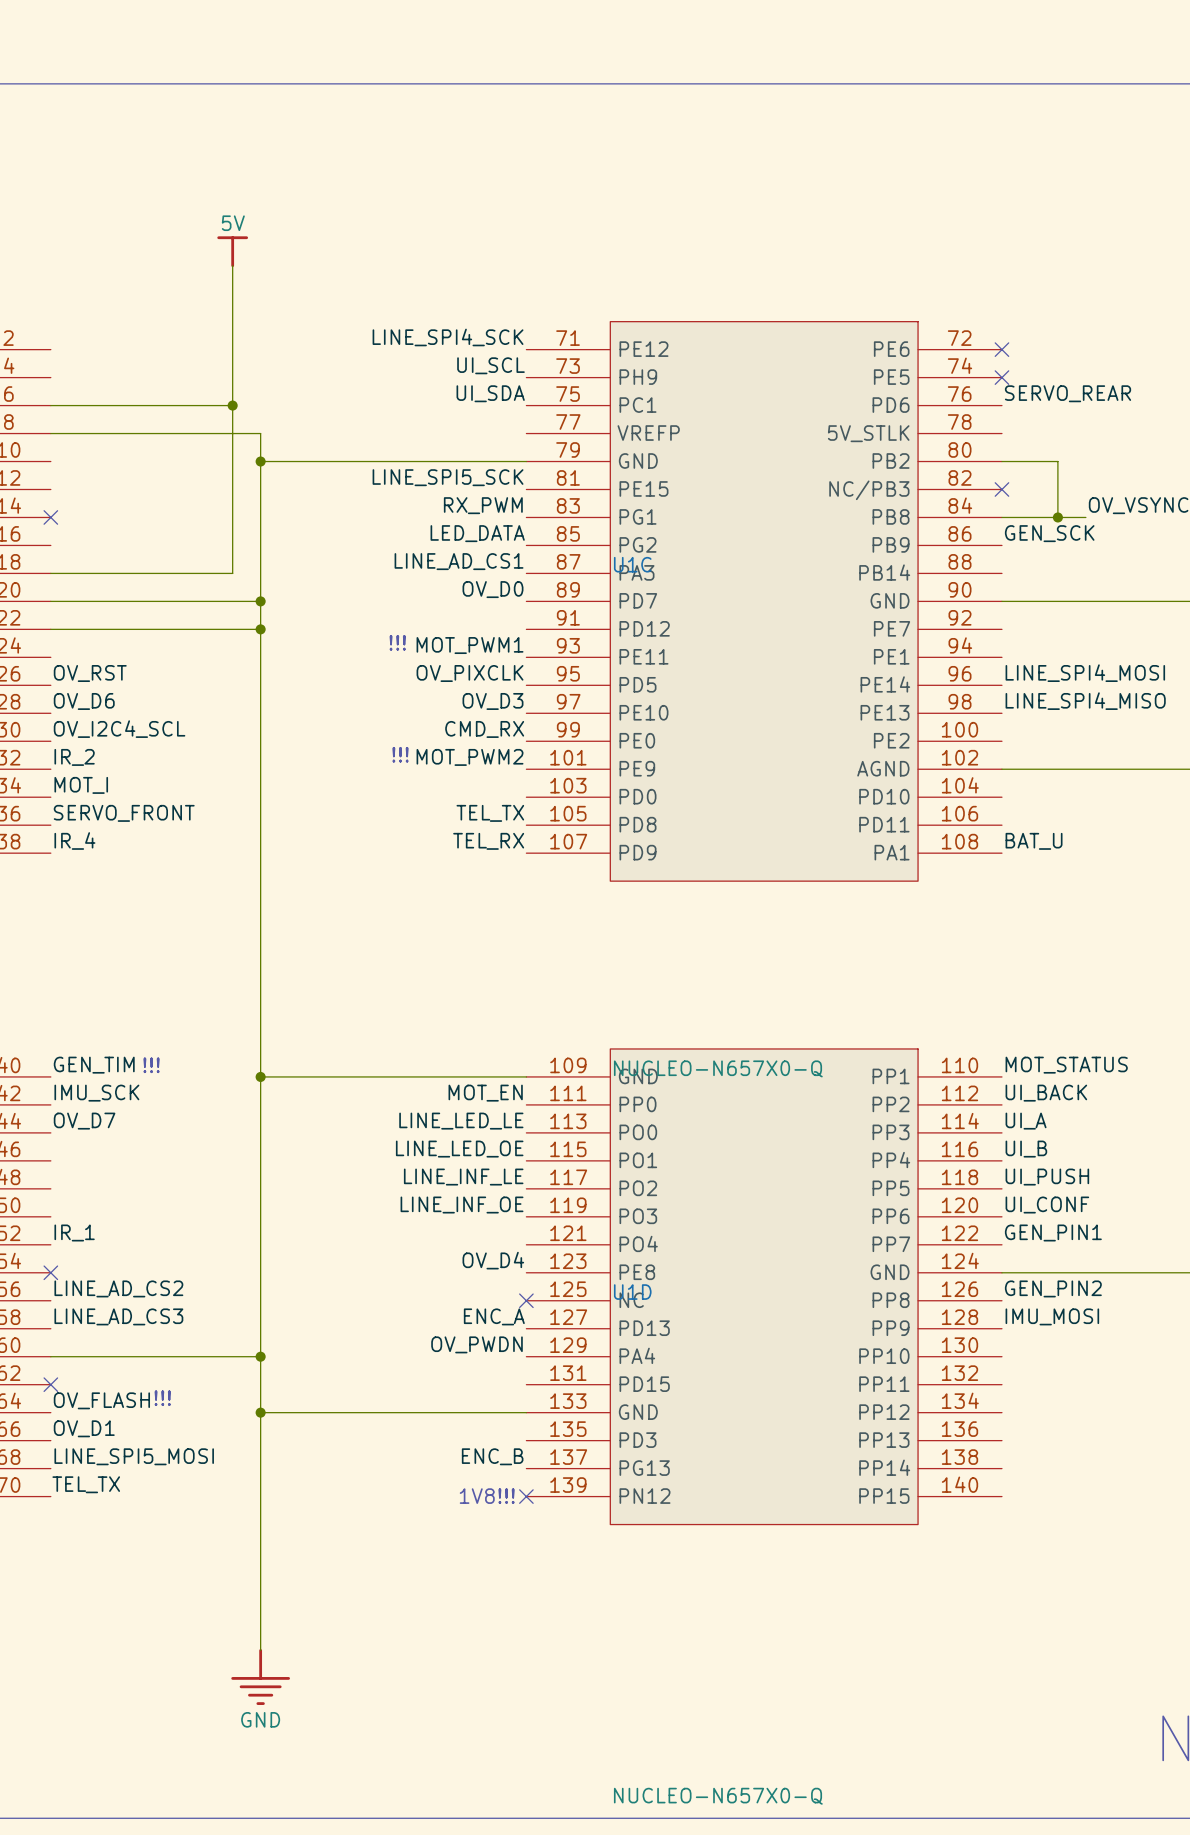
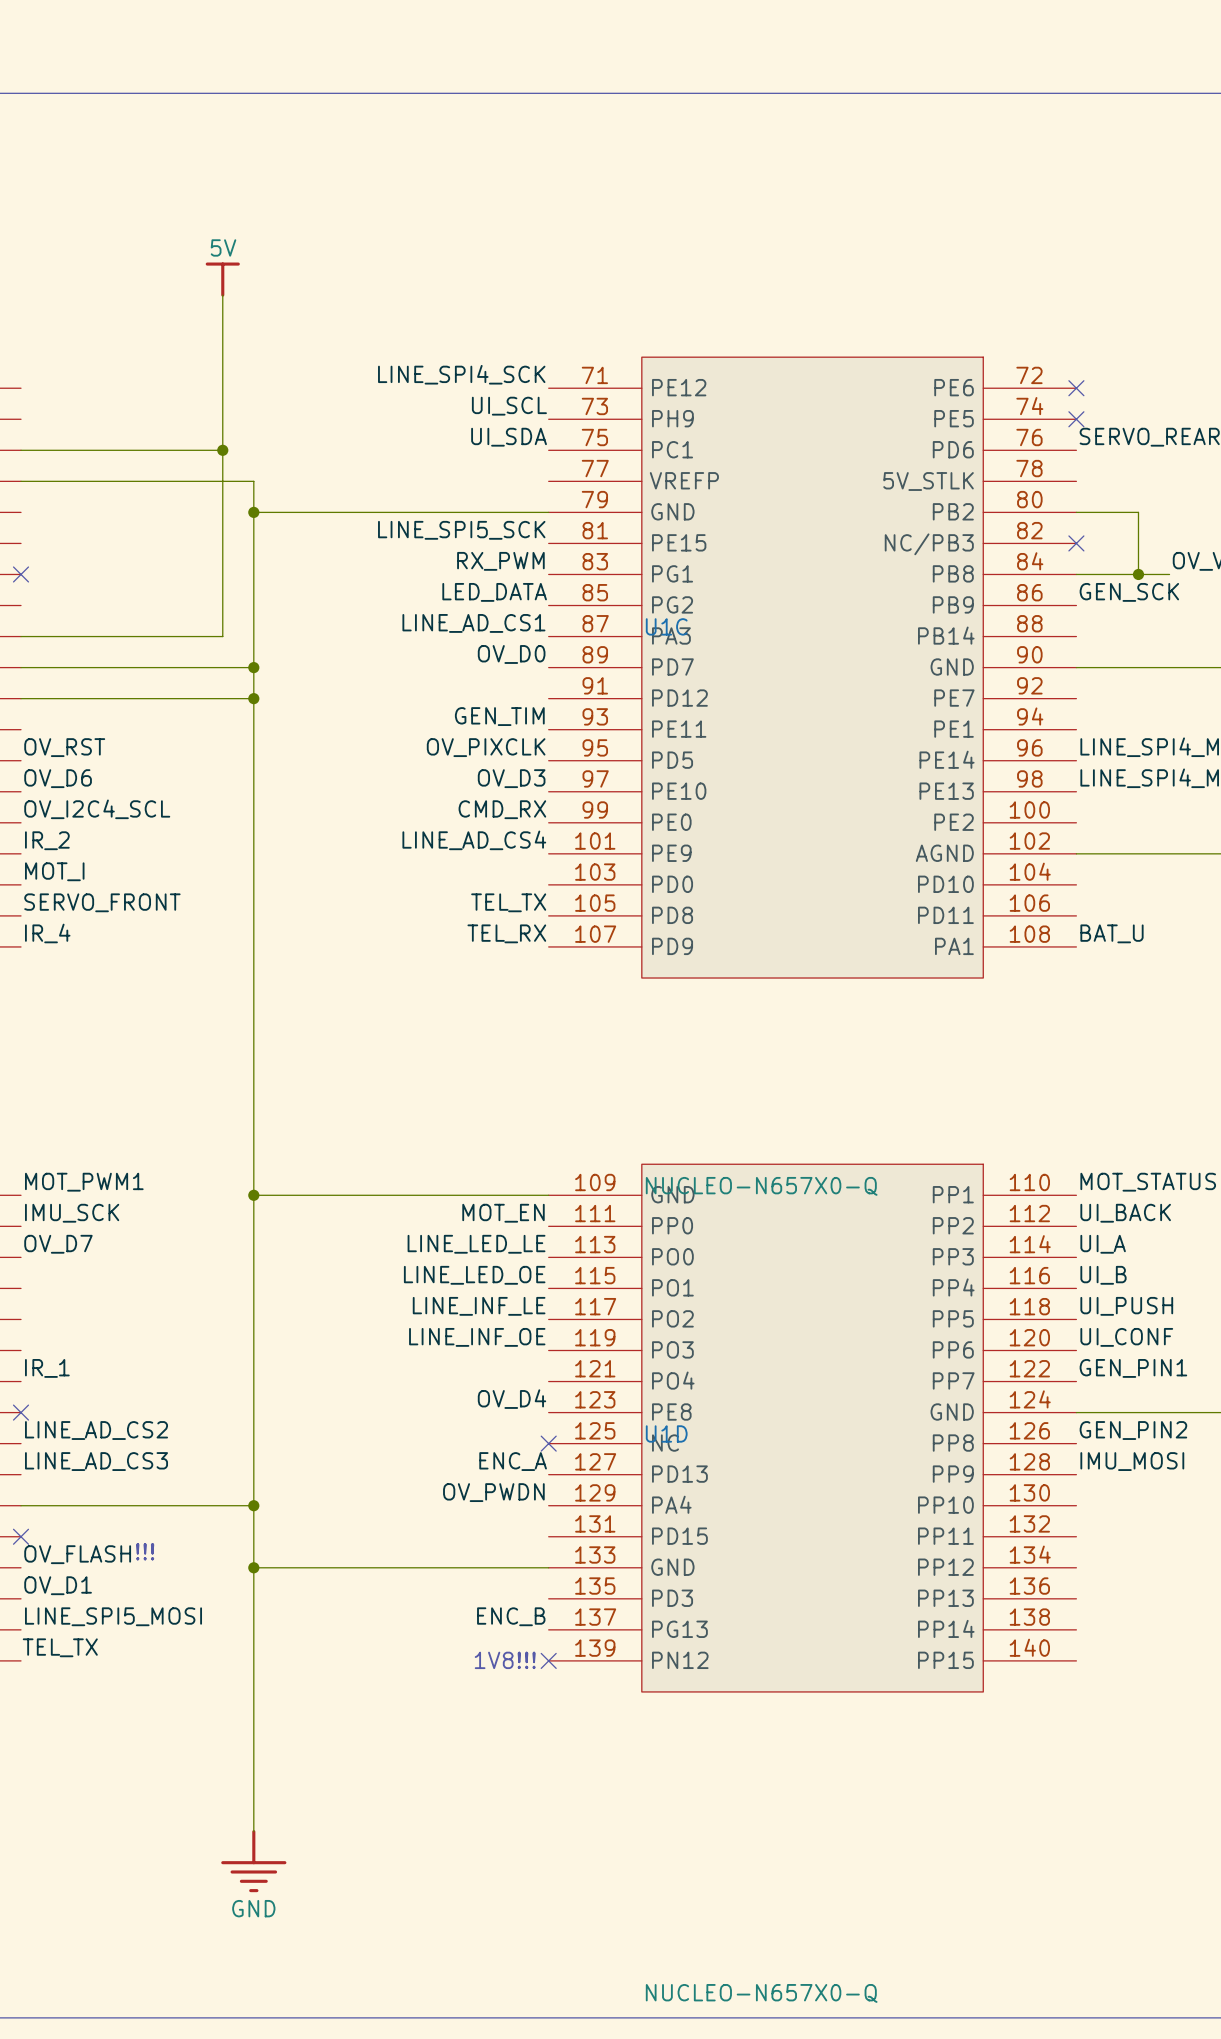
text: !!! (397, 642) -> none
label: MOT_PWM1 (470, 645) -> GEN_TIM (499, 716)
text: !!! (400, 754) -> none
label: MOT_PWM2 (470, 757) -> LINE_AD_CS4 (474, 840)
label: GEN_TIM (94, 1065) -> MOT_PWM1 (84, 1182)
text: !!! (151, 1065) -> none

